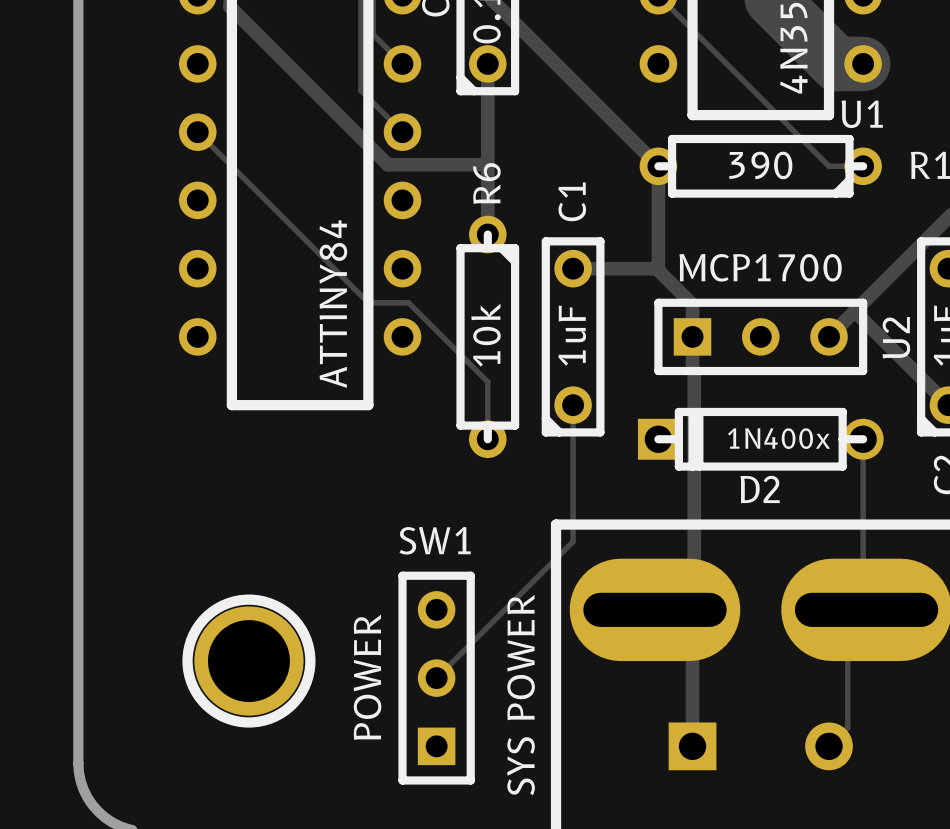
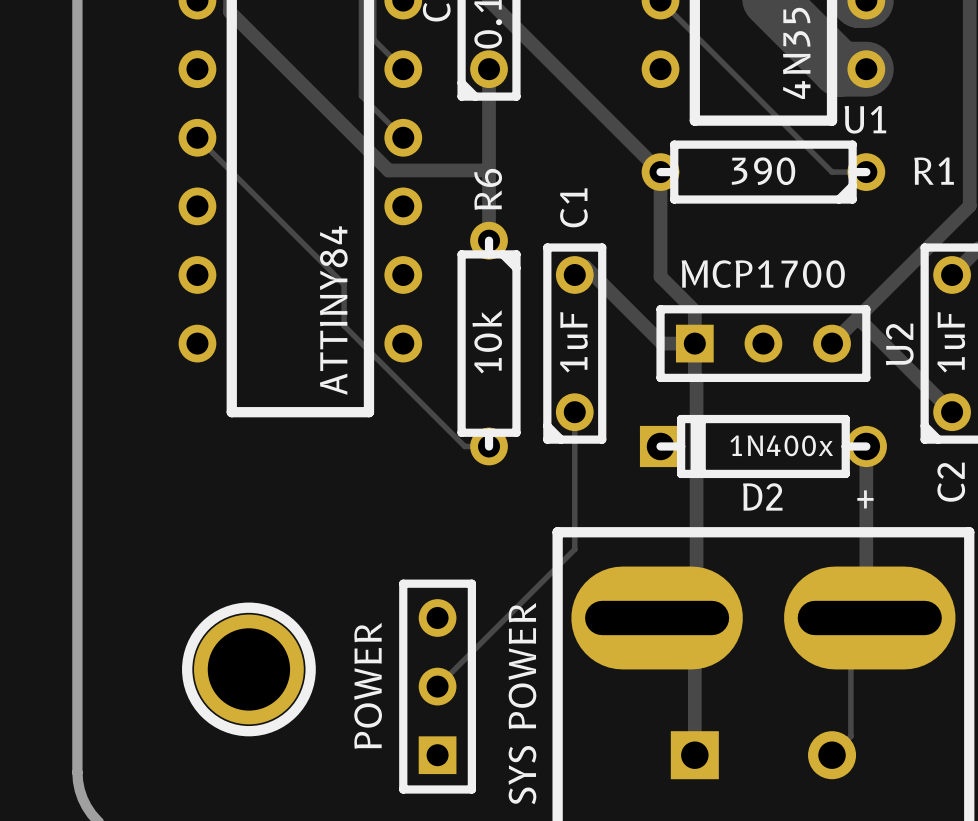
track: (573, 268) (658, 268) -> (574, 274) (585, 266) (662, 343) (694, 343)
track: (343, 278) (368, 302) (408, 302) (487, 381) (487, 439) -> (344, 284) (344, 325) (464, 446) (489, 446)
track width: thin (863, 439) (863, 594) -> thick (866, 446) (866, 602)
text: none -> + (865, 499)
SW1 name: SW1 (435, 540) -> none

